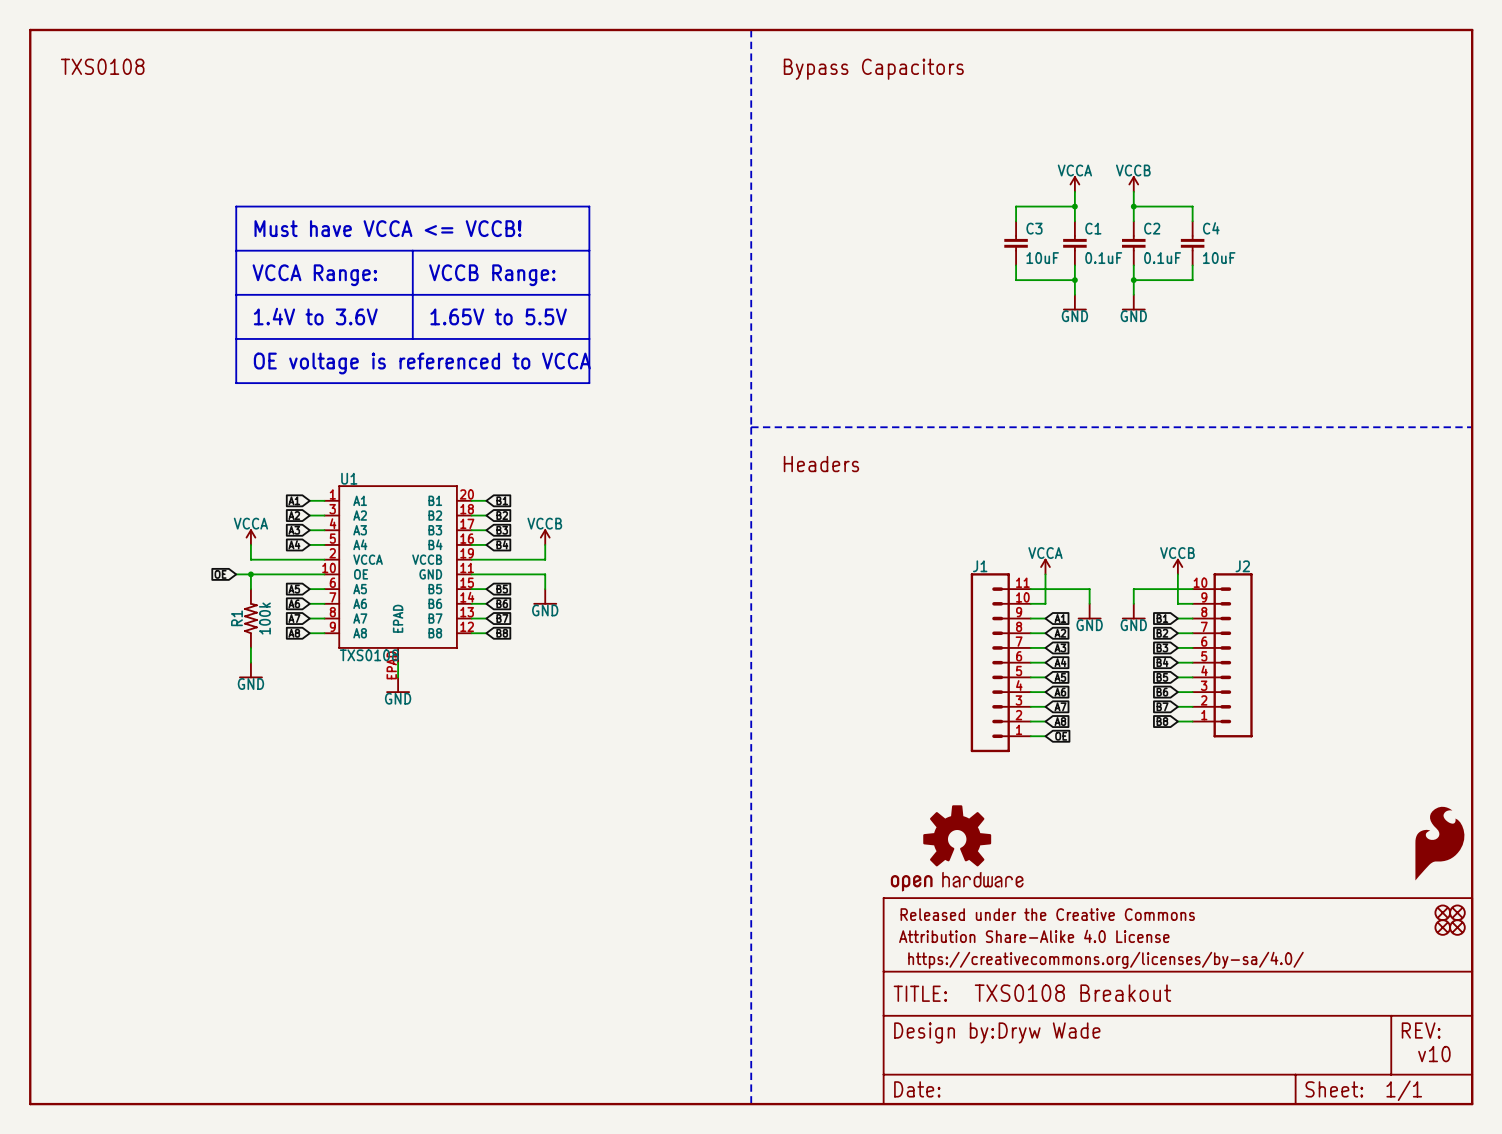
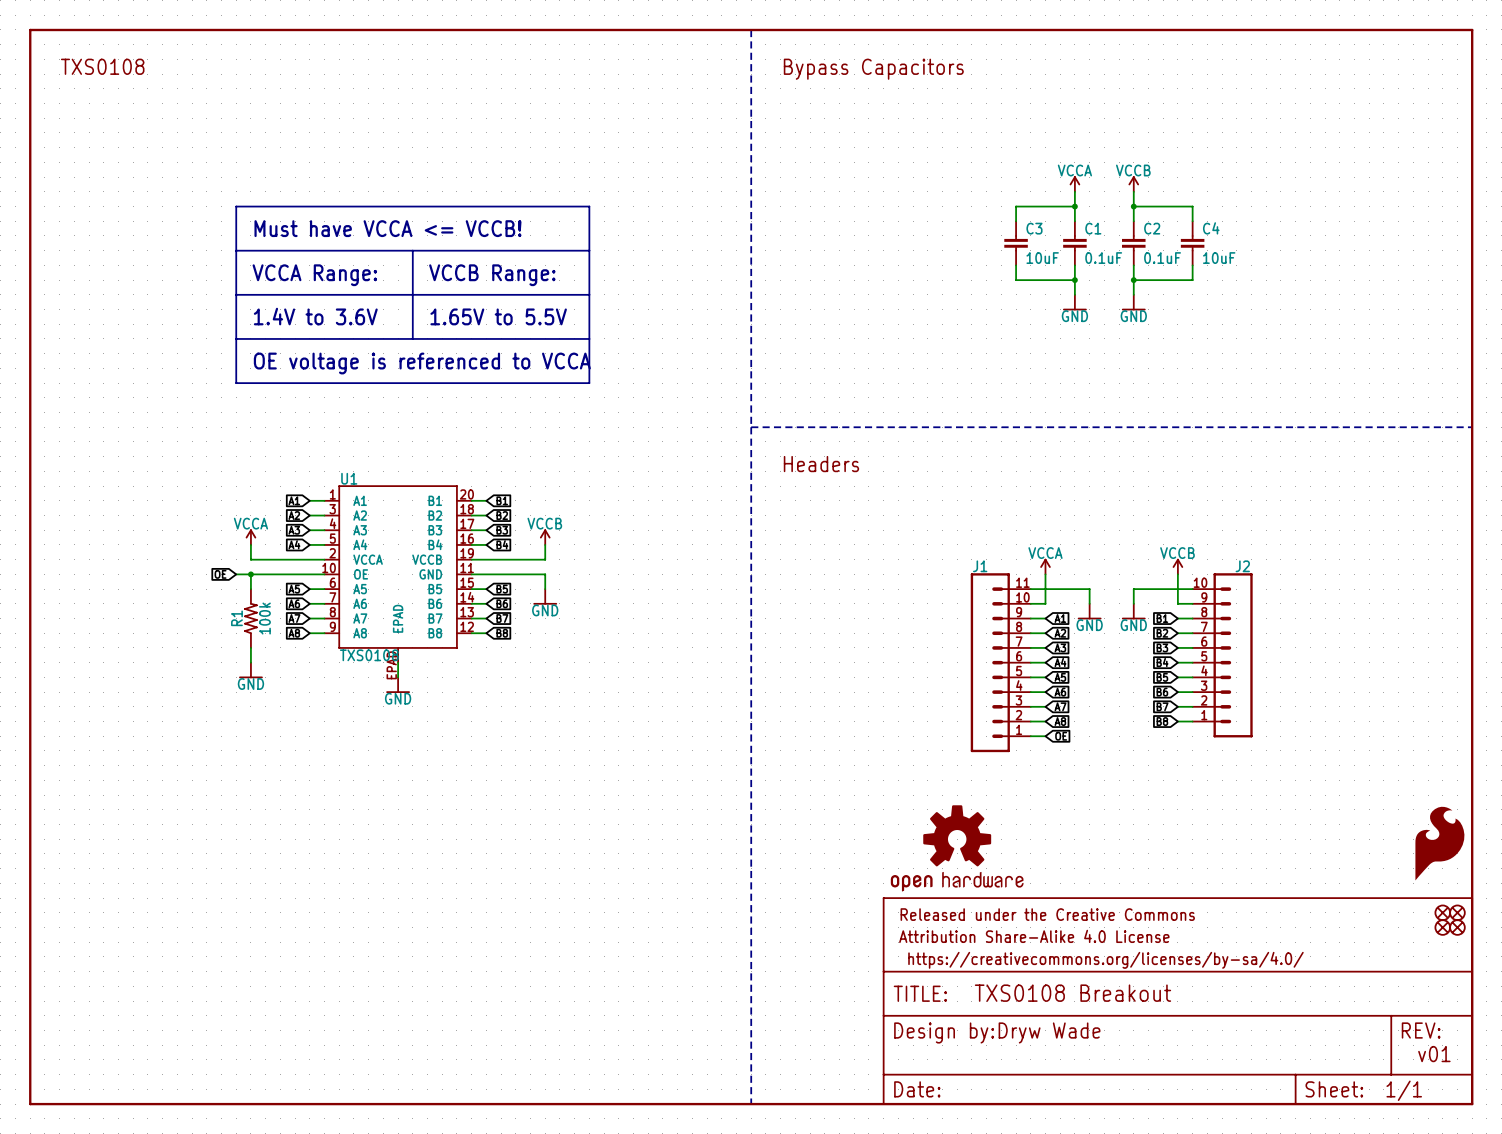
text: v10 (1434, 1054) -> v01 (1434, 1054)

